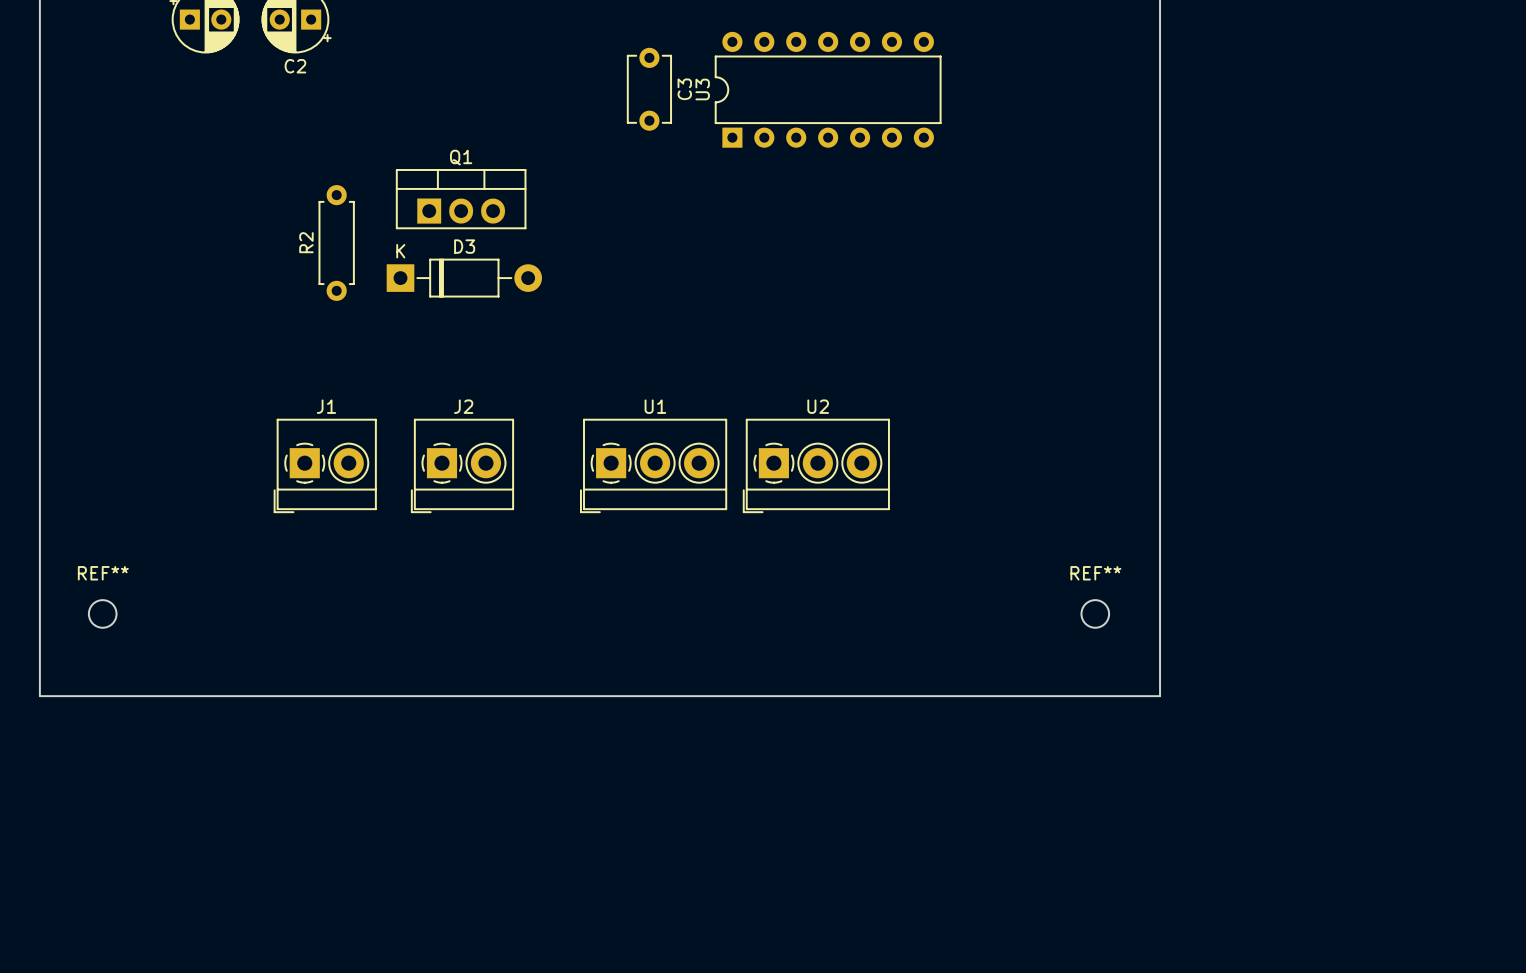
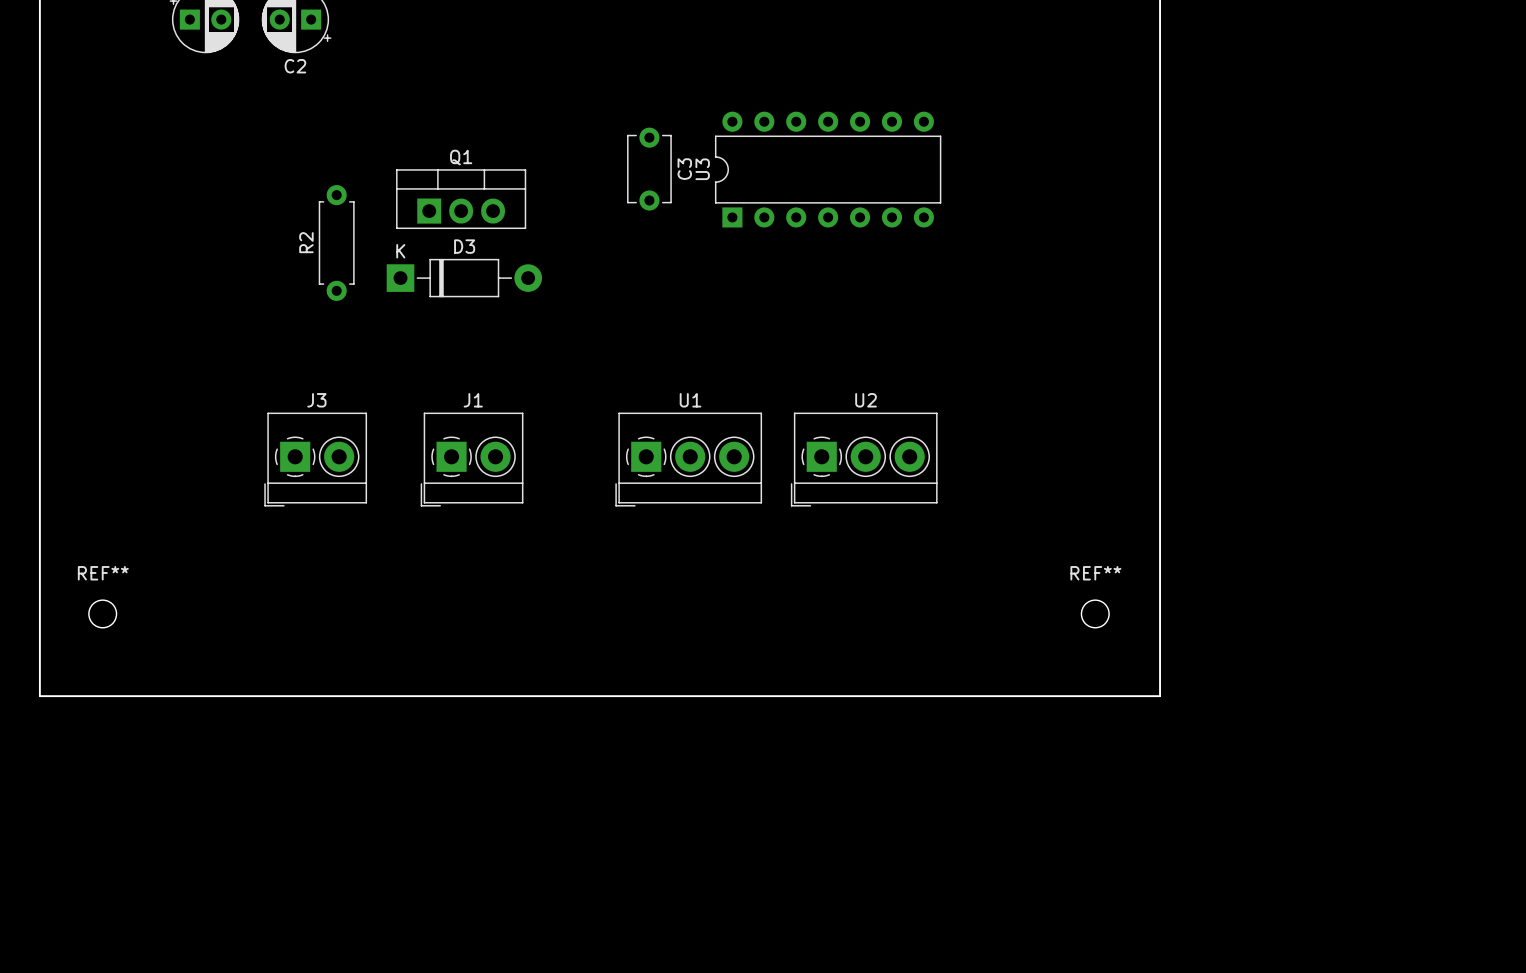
C3 position: (649, 89) -> (649, 169)
U3 position: (828, 89) -> (828, 169)
J3: none -> (315, 459)
J1 position: (325, 465) -> (472, 459)
J2: (462, 465) -> none
U1 position: (653, 465) -> (688, 459)
U2 position: (816, 465) -> (864, 459)

